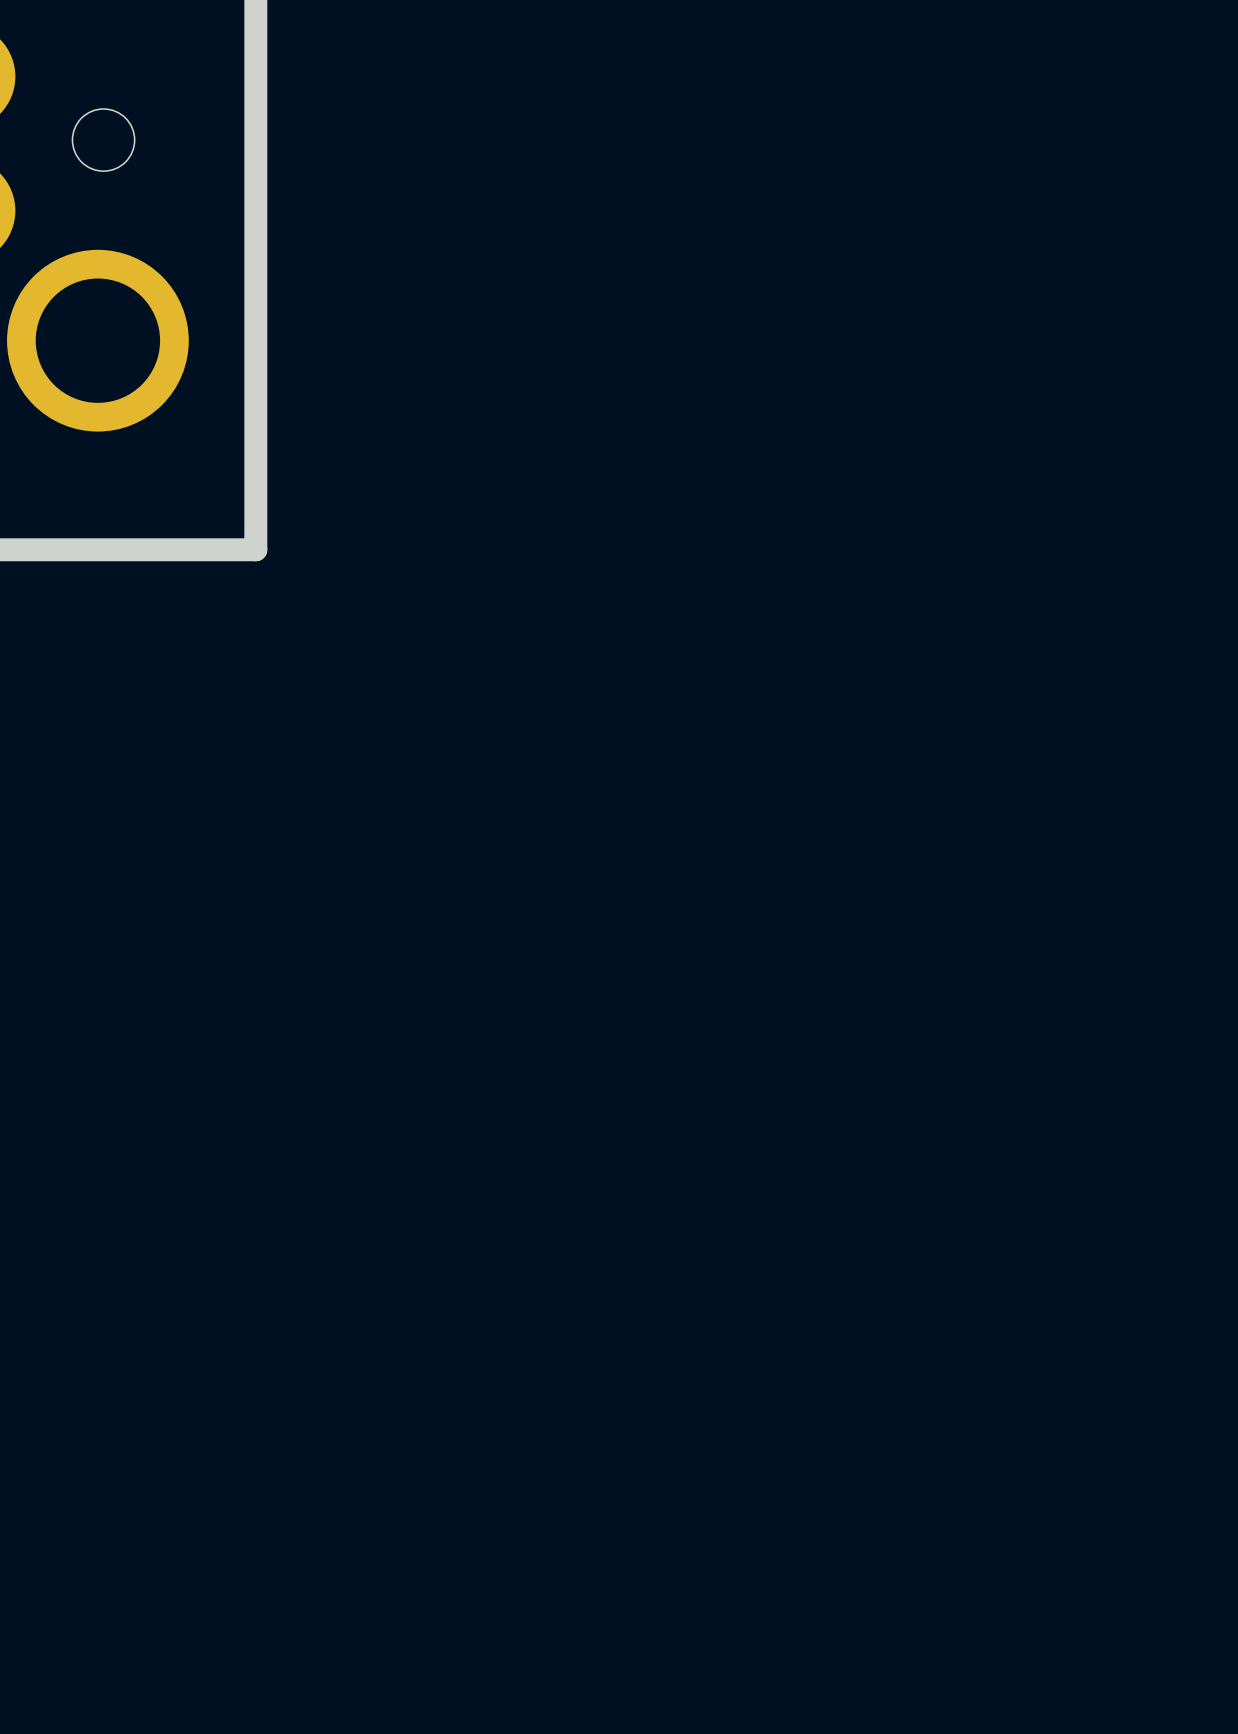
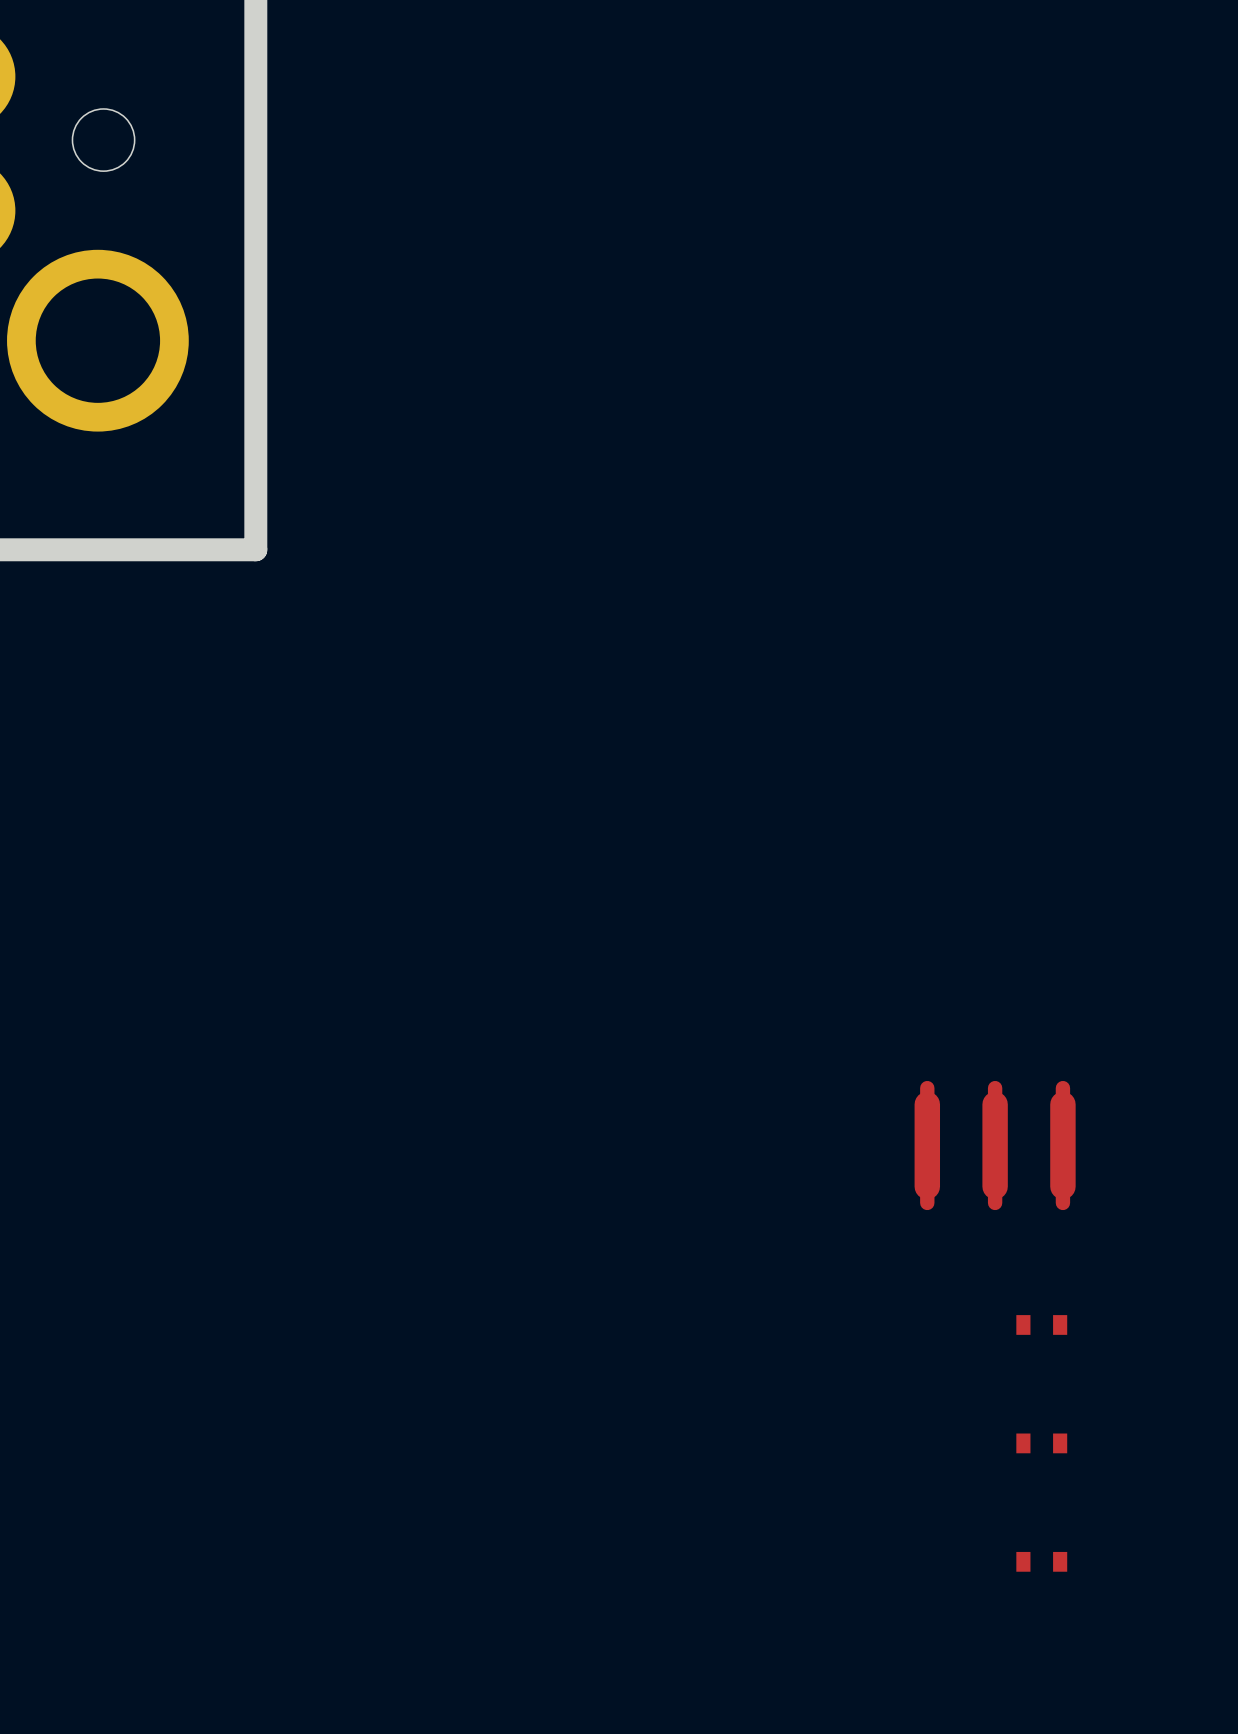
part: none -> (995, 1145)
part: none -> (1041, 1324)
part: none -> (1041, 1443)
part: none -> (1041, 1561)

